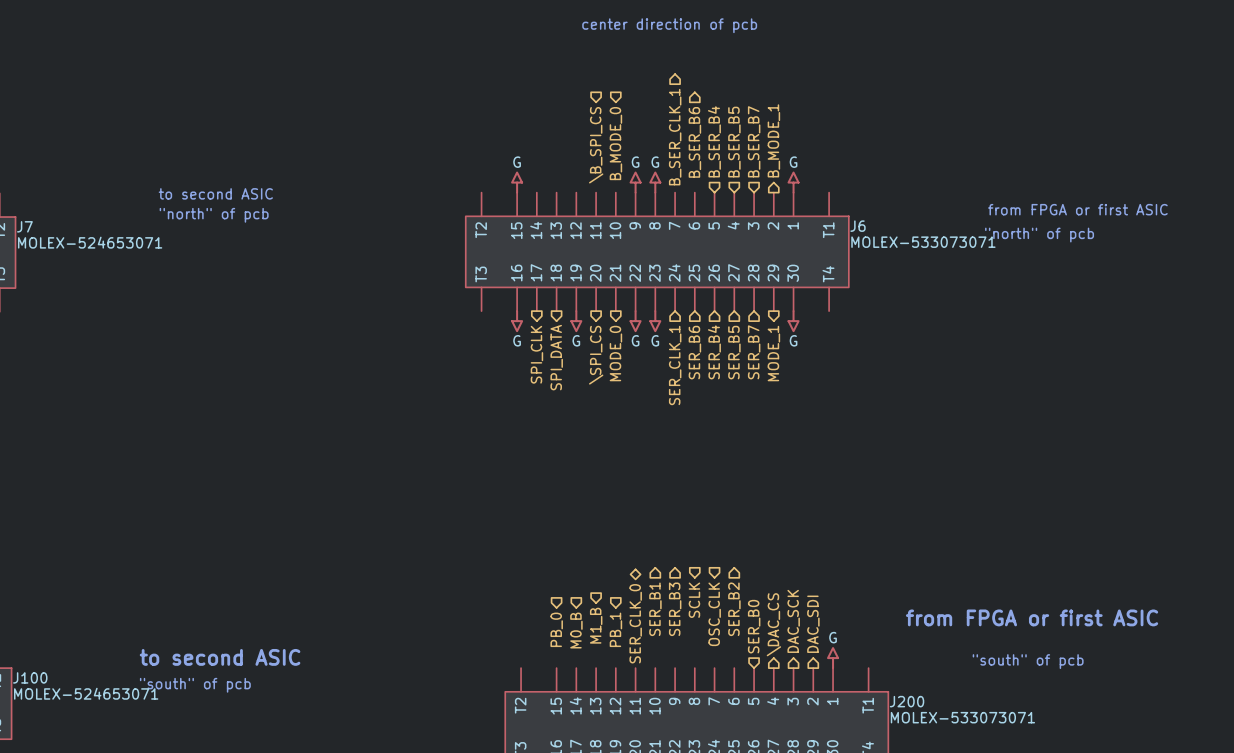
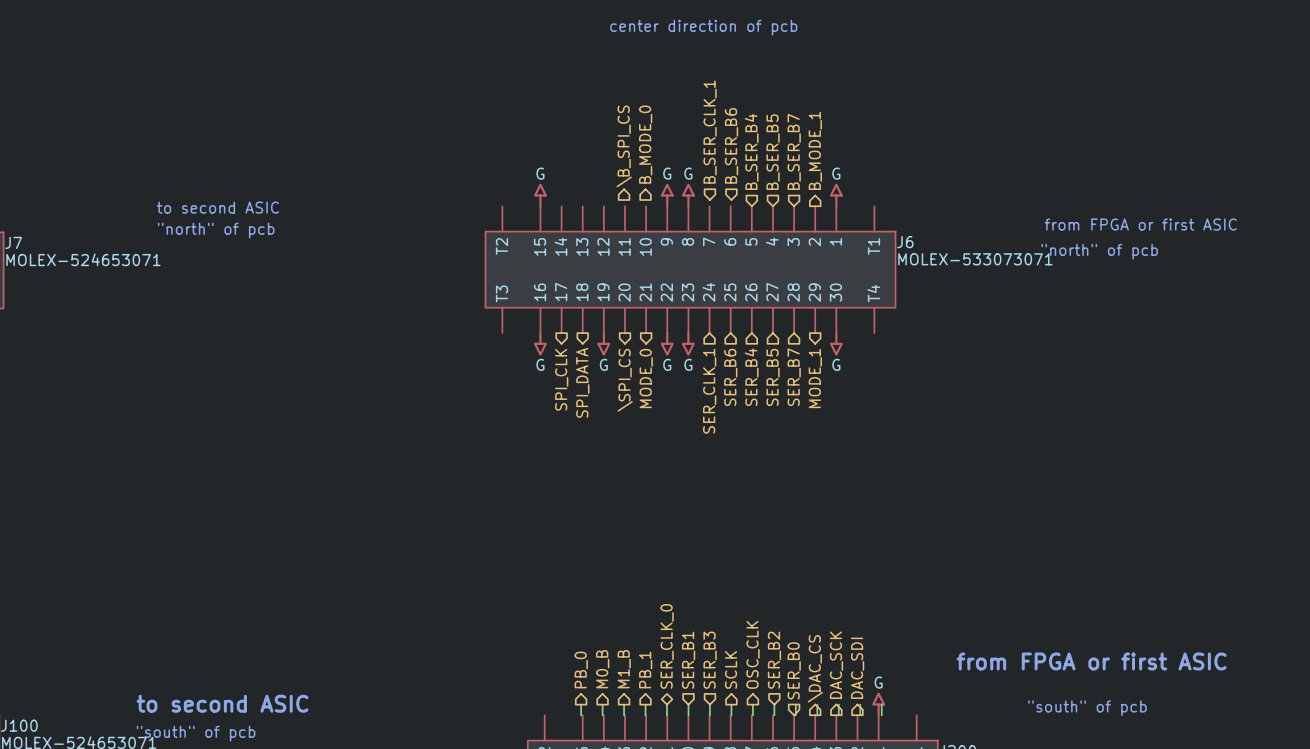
hierarchical label rotation: 0° (675, 137) -> 180° (710, 132)
hierarchical label rotation: 0° (694, 142) -> 180° (731, 145)
hierarchical label rotation: 0° (615, 143) -> 180° (645, 144)
hierarchical label rotation: 0° (596, 145) -> 180° (624, 146)
hierarchical label rotation: 0° (694, 600) -> 180° (731, 669)
hierarchical label rotation: 0° (655, 609) -> 180° (688, 660)
hierarchical label rotation: 0° (675, 609) -> 180° (710, 660)
hierarchical label rotation: 0° (734, 609) -> 180° (774, 660)
hierarchical label rotation: 0° (714, 614) -> 180° (753, 654)
hierarchical label rotation: 0° (635, 623) -> 180° (667, 646)
hierarchical label rotation: 0° (596, 625) -> 180° (624, 669)
hierarchical label rotation: 0° (556, 629) -> 180° (581, 669)
hierarchical label rotation: 0° (615, 629) -> 180° (645, 669)
hierarchical label rotation: 0° (576, 630) -> 180° (602, 669)
wire: none -> (581, 704) (581, 715)
wire: none -> (602, 704) (602, 715)
wire: none -> (624, 704) (624, 715)
wire: none -> (645, 704) (645, 715)
wire: none -> (667, 704) (667, 715)
wire: none -> (688, 704) (688, 715)
wire: none -> (709, 704) (709, 715)
wire: none -> (731, 704) (731, 715)
wire: none -> (752, 704) (752, 715)
wire: none -> (774, 704) (774, 715)
wire: none -> (795, 704) (795, 715)
wire: none -> (817, 704) (817, 715)
wire: none -> (838, 704) (838, 715)
wire: none -> (860, 704) (860, 715)
wire: none -> (881, 704) (881, 715)

